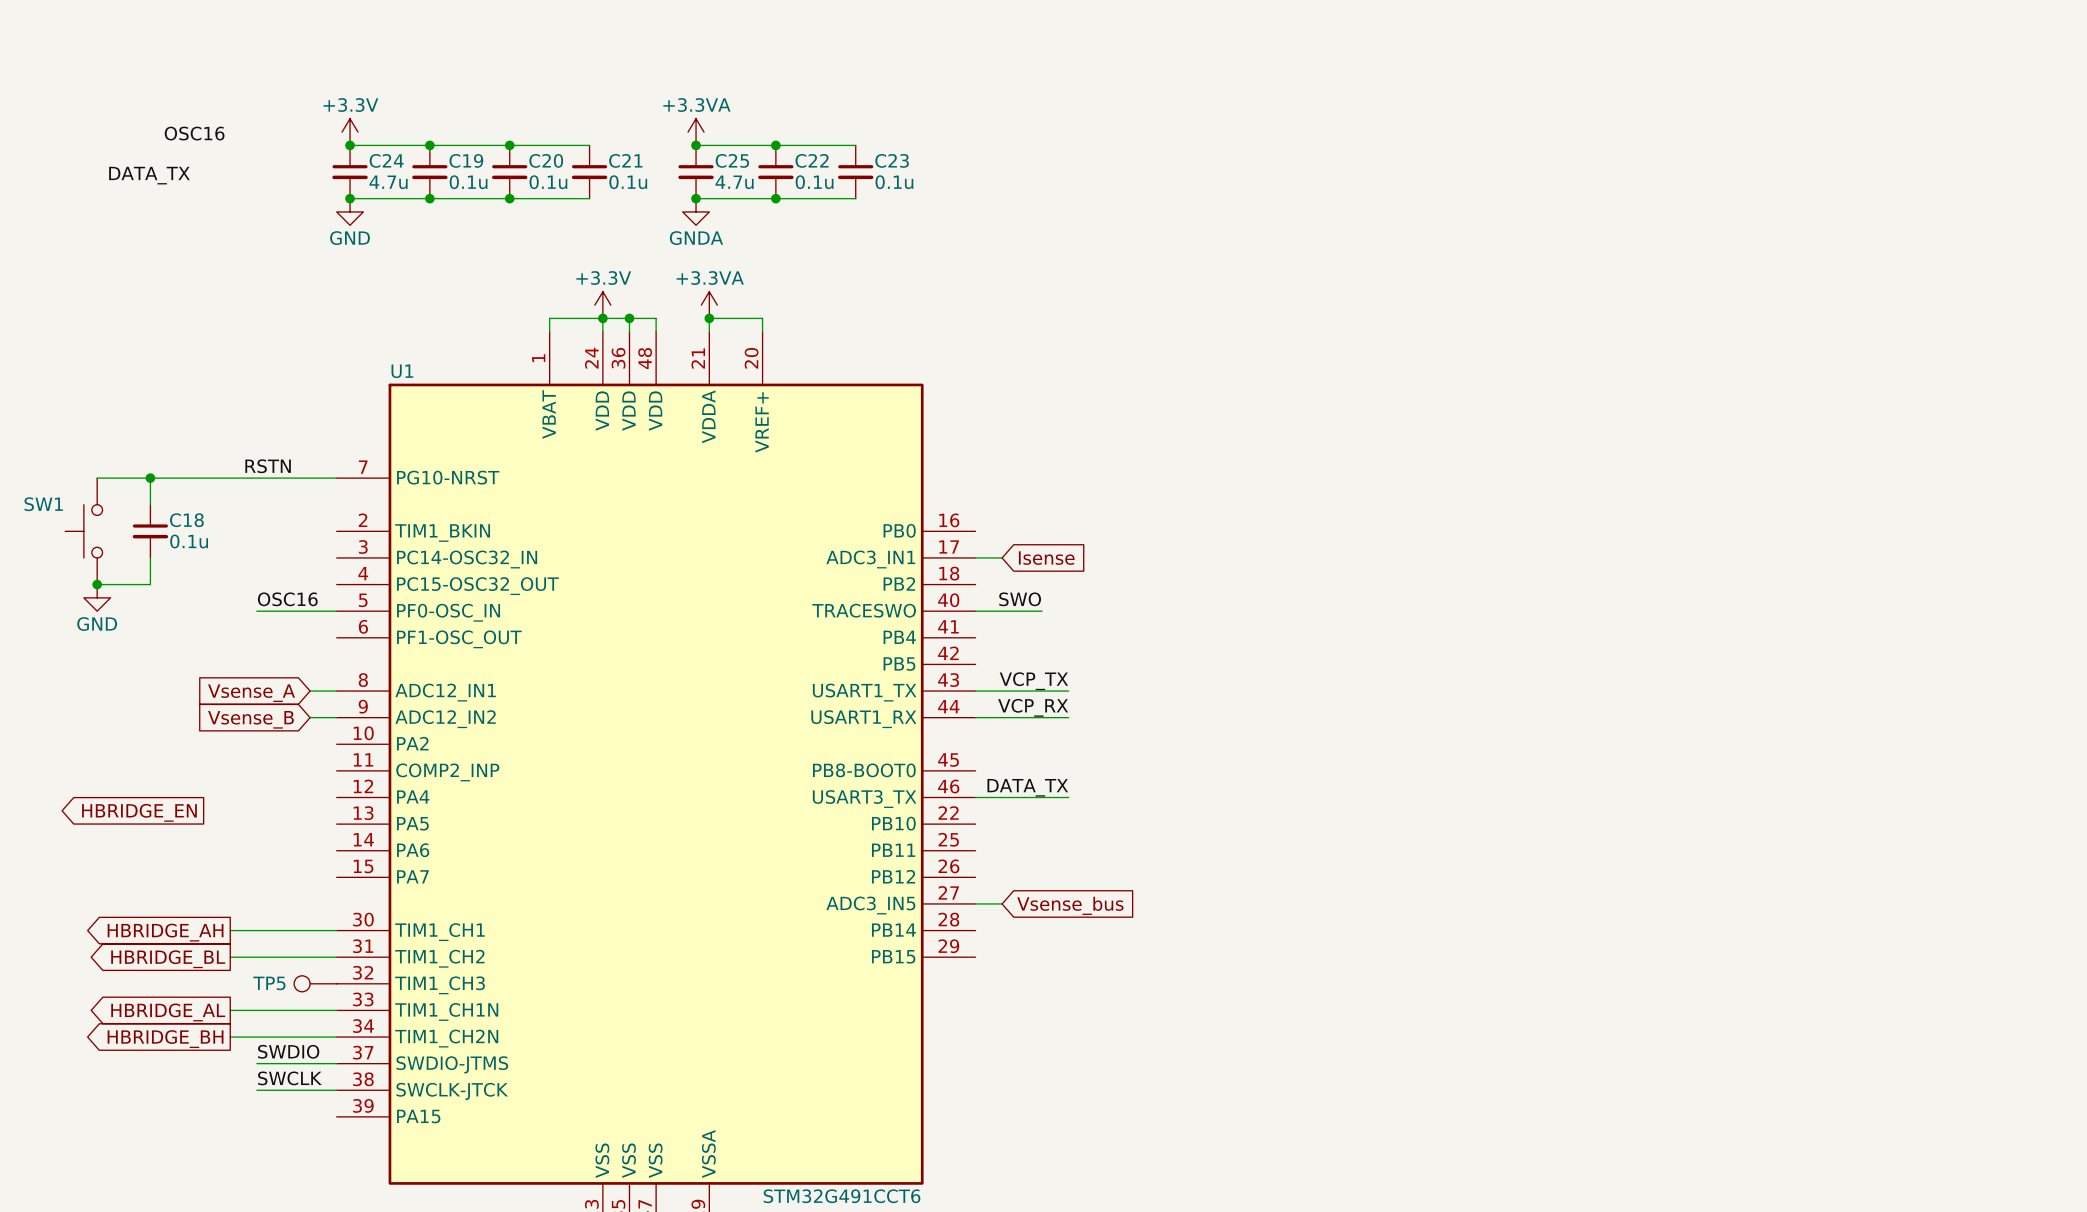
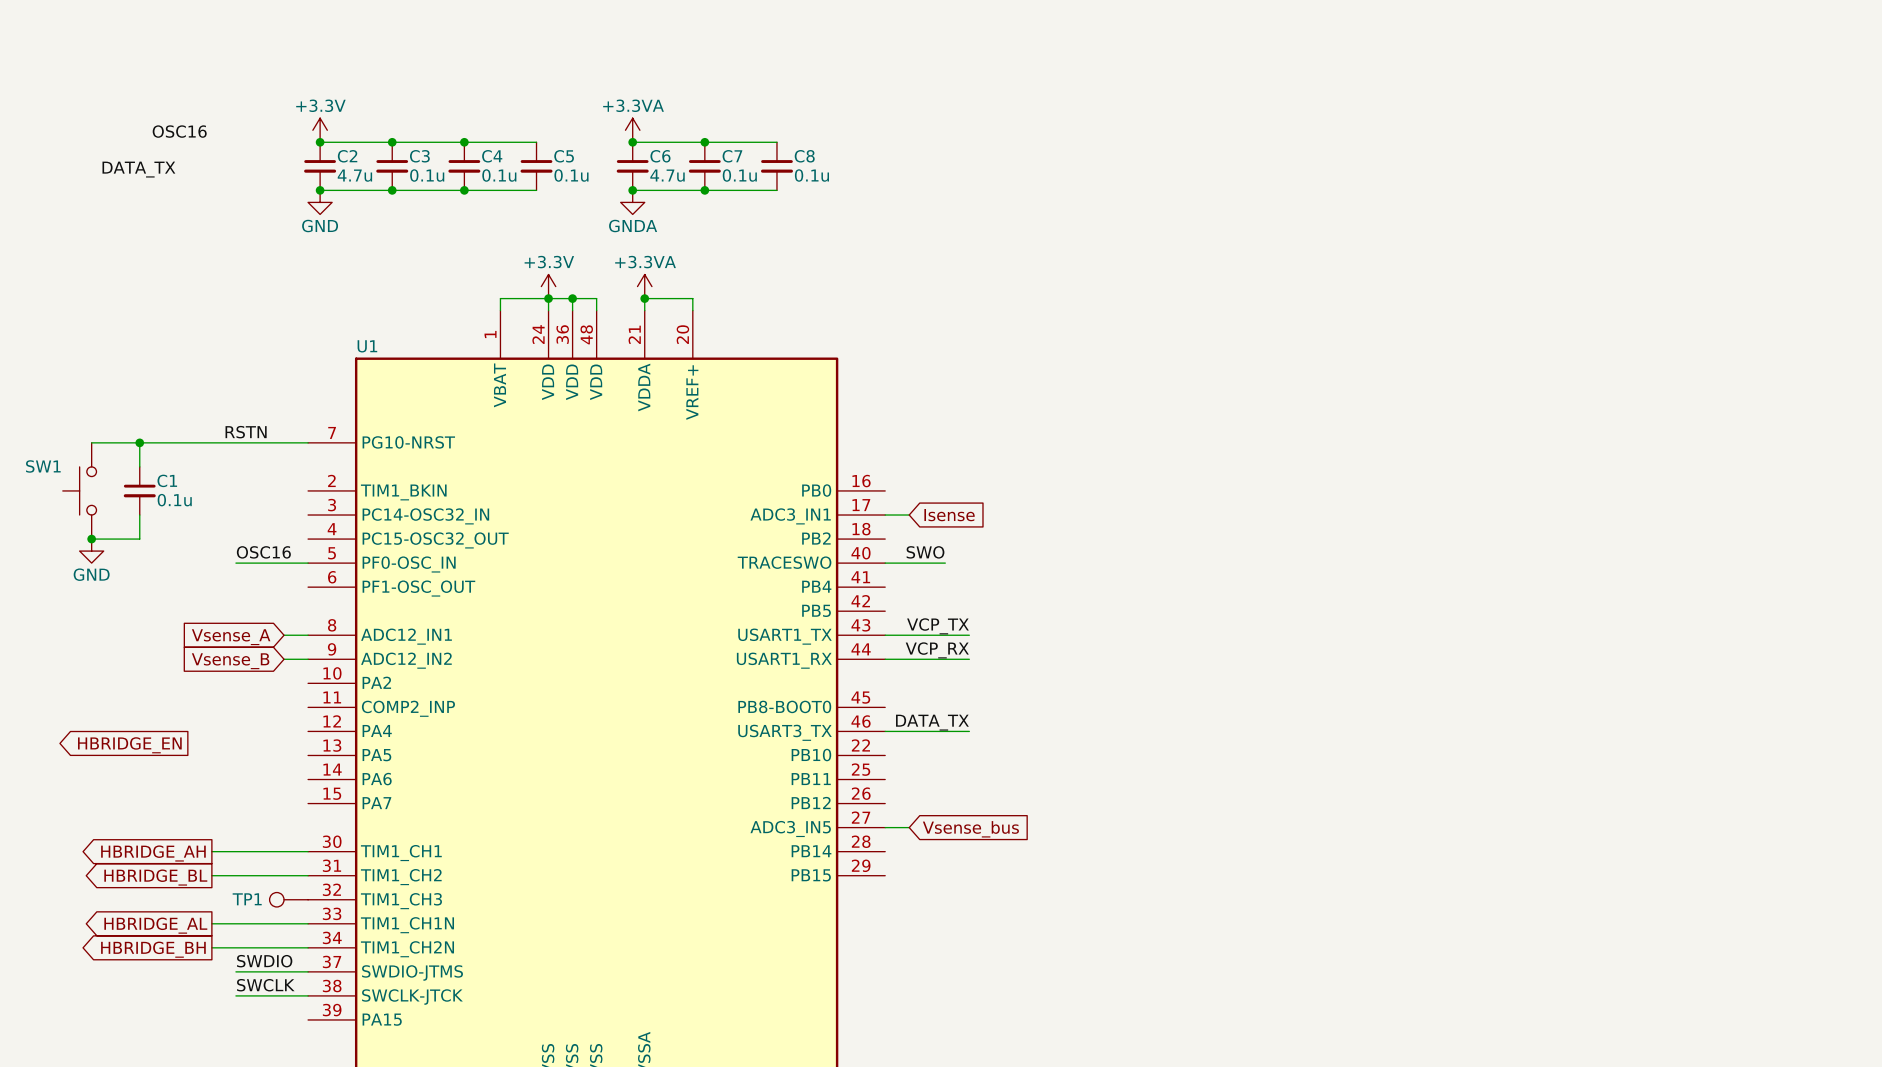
C24 name: C24 (386, 160) -> C2 (347, 156)
C19 name: C19 (466, 160) -> C3 (419, 156)
C20 name: C20 (546, 160) -> C4 (492, 156)
C21 name: C21 (625, 160) -> C5 (564, 156)
C25 name: C25 (732, 160) -> C6 (660, 156)
C22 name: C22 (812, 160) -> C7 (732, 156)
C23 name: C23 (892, 160) -> C8 (804, 156)
C18 name: C18 (186, 520) -> C1 (167, 480)
TP5 name: TP5 (269, 983) -> TP1 (247, 899)

